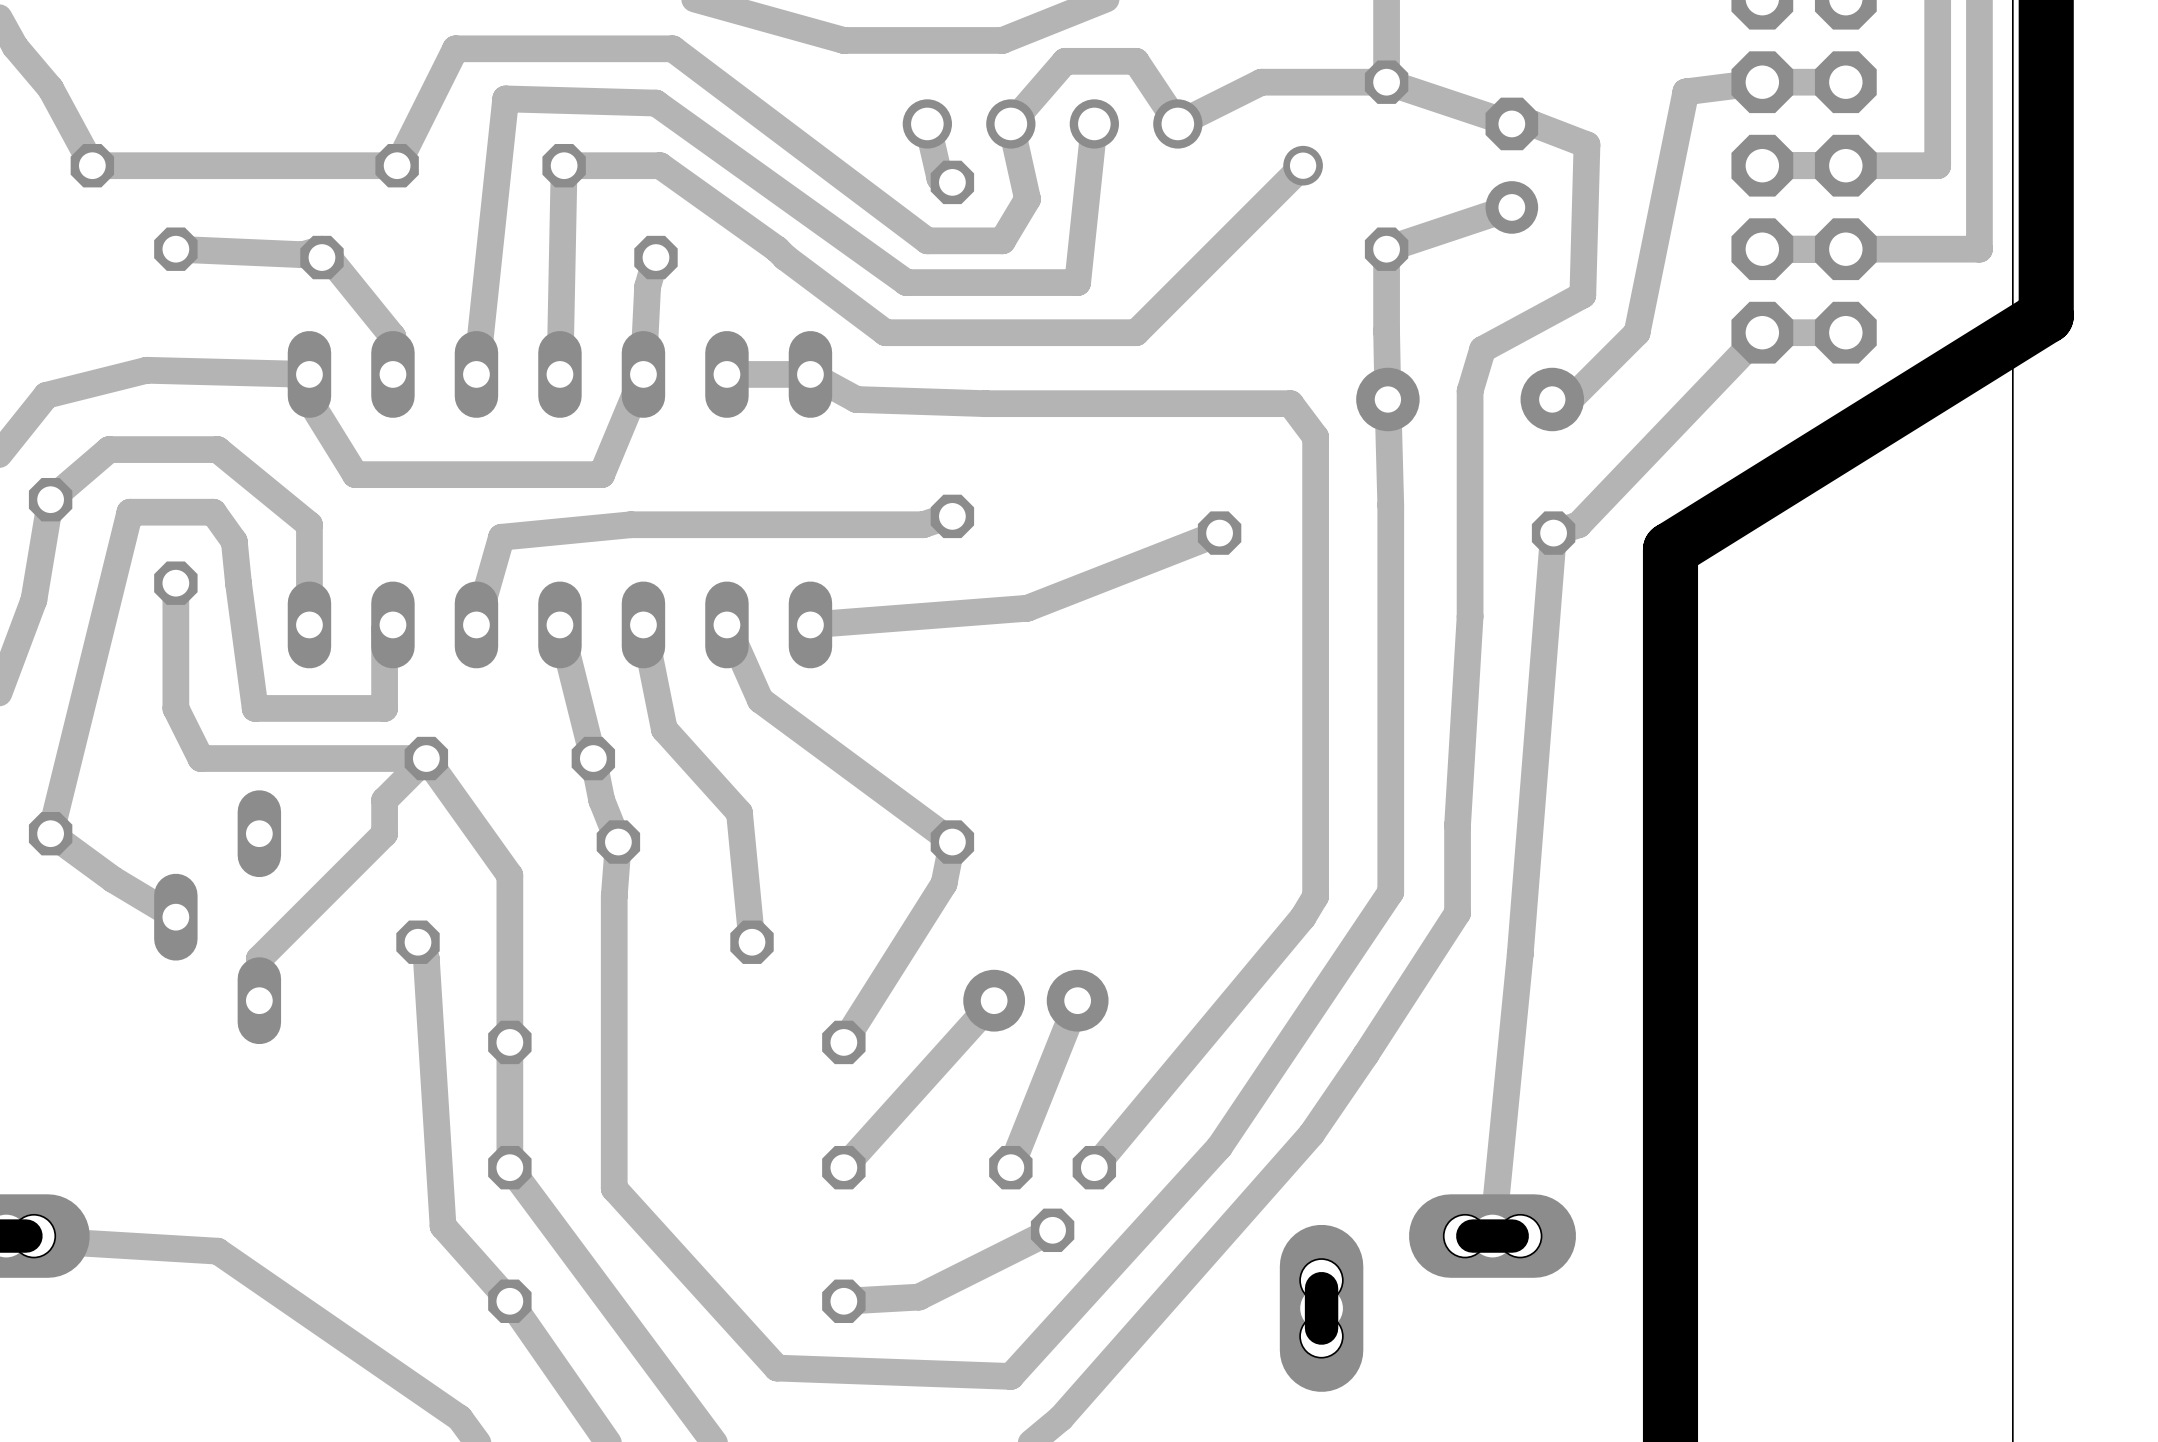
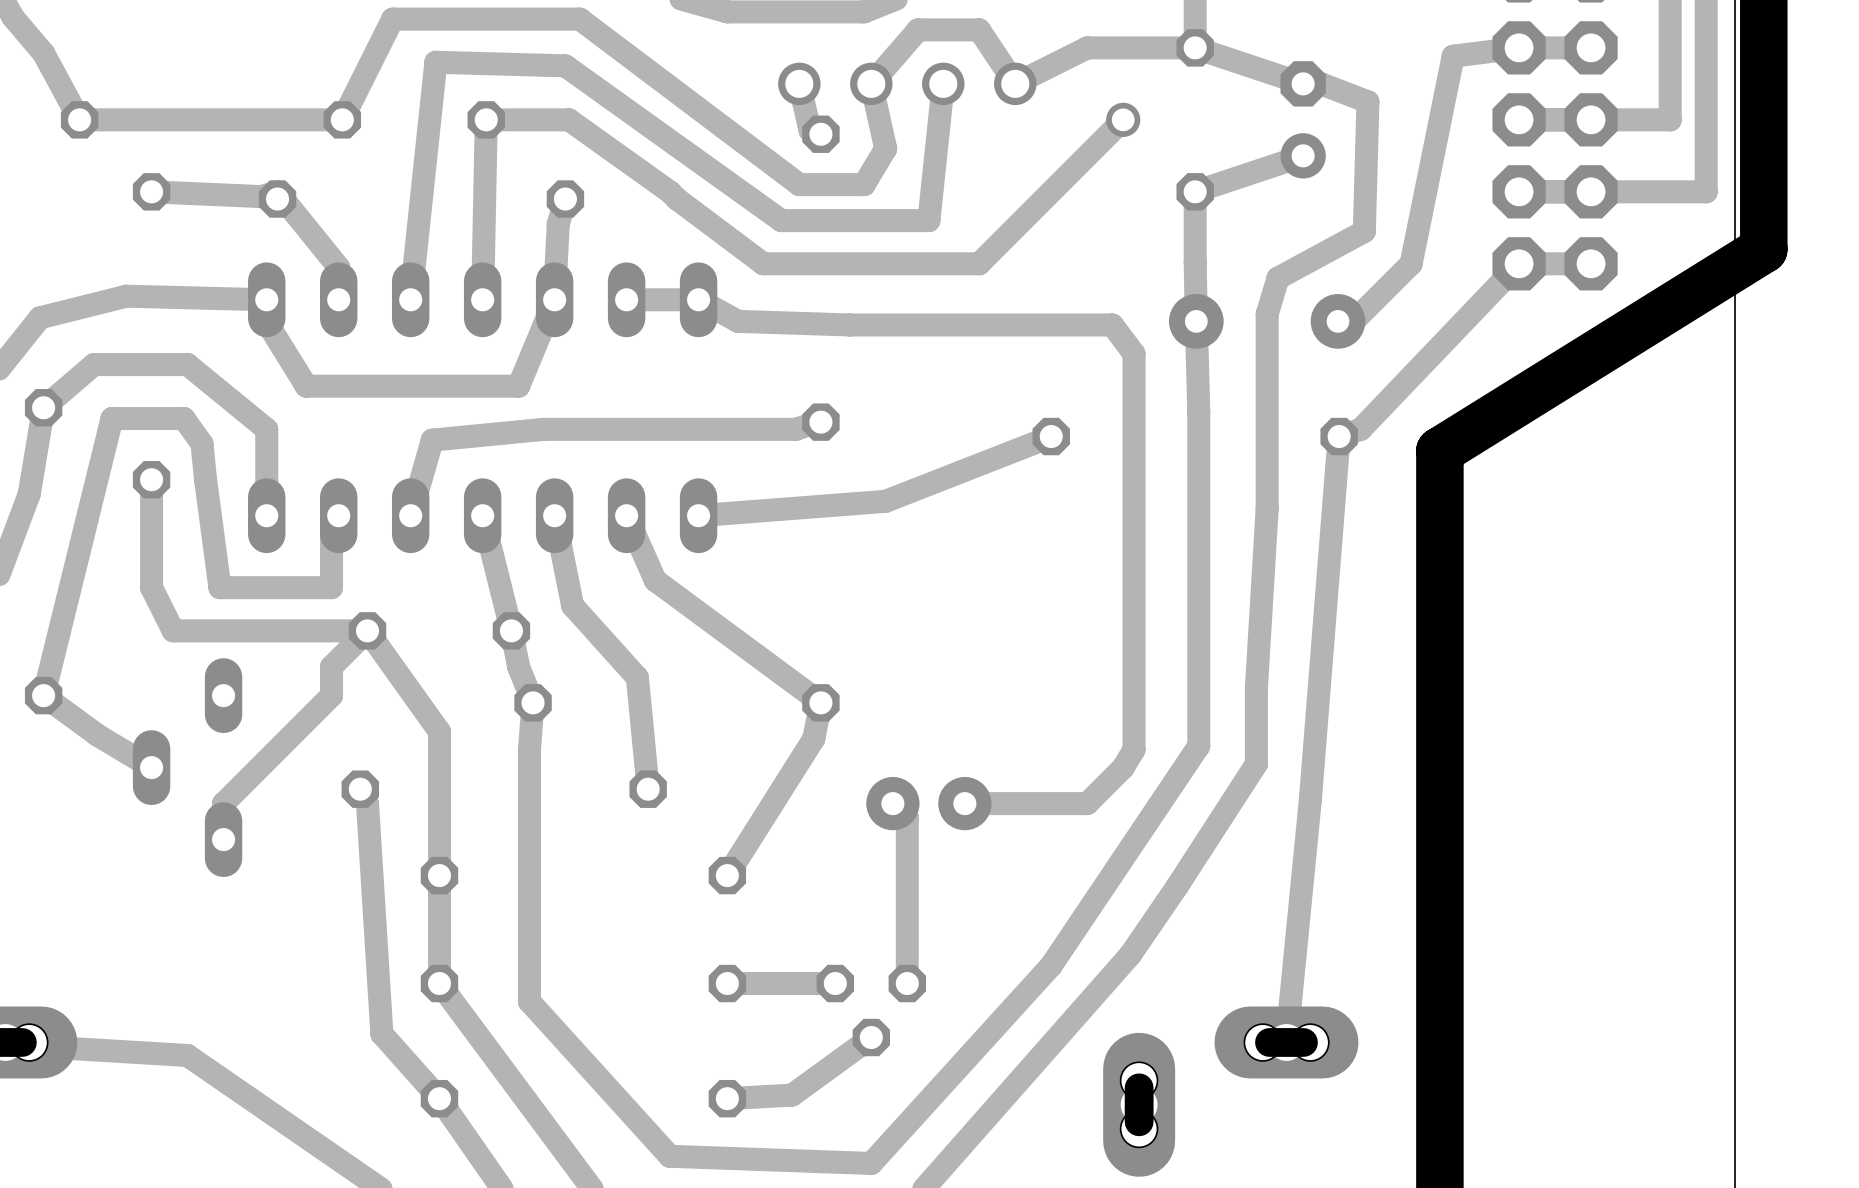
track: (1303, 917) (1094, 1167) -> (1123, 767) (1087, 803) (964, 803)
track: none -> (892, 803) (907, 818) (907, 983)
track: (994, 1000) (843, 1167) -> (835, 983) (727, 983)
part position: (1035, 1000) -> (928, 803)
track: (1077, 1000) (1010, 1167) -> none
part position: (1052, 1198) -> (871, 1010)
track: (1052, 1230) (919, 1297) -> (871, 1037) (792, 1095)

